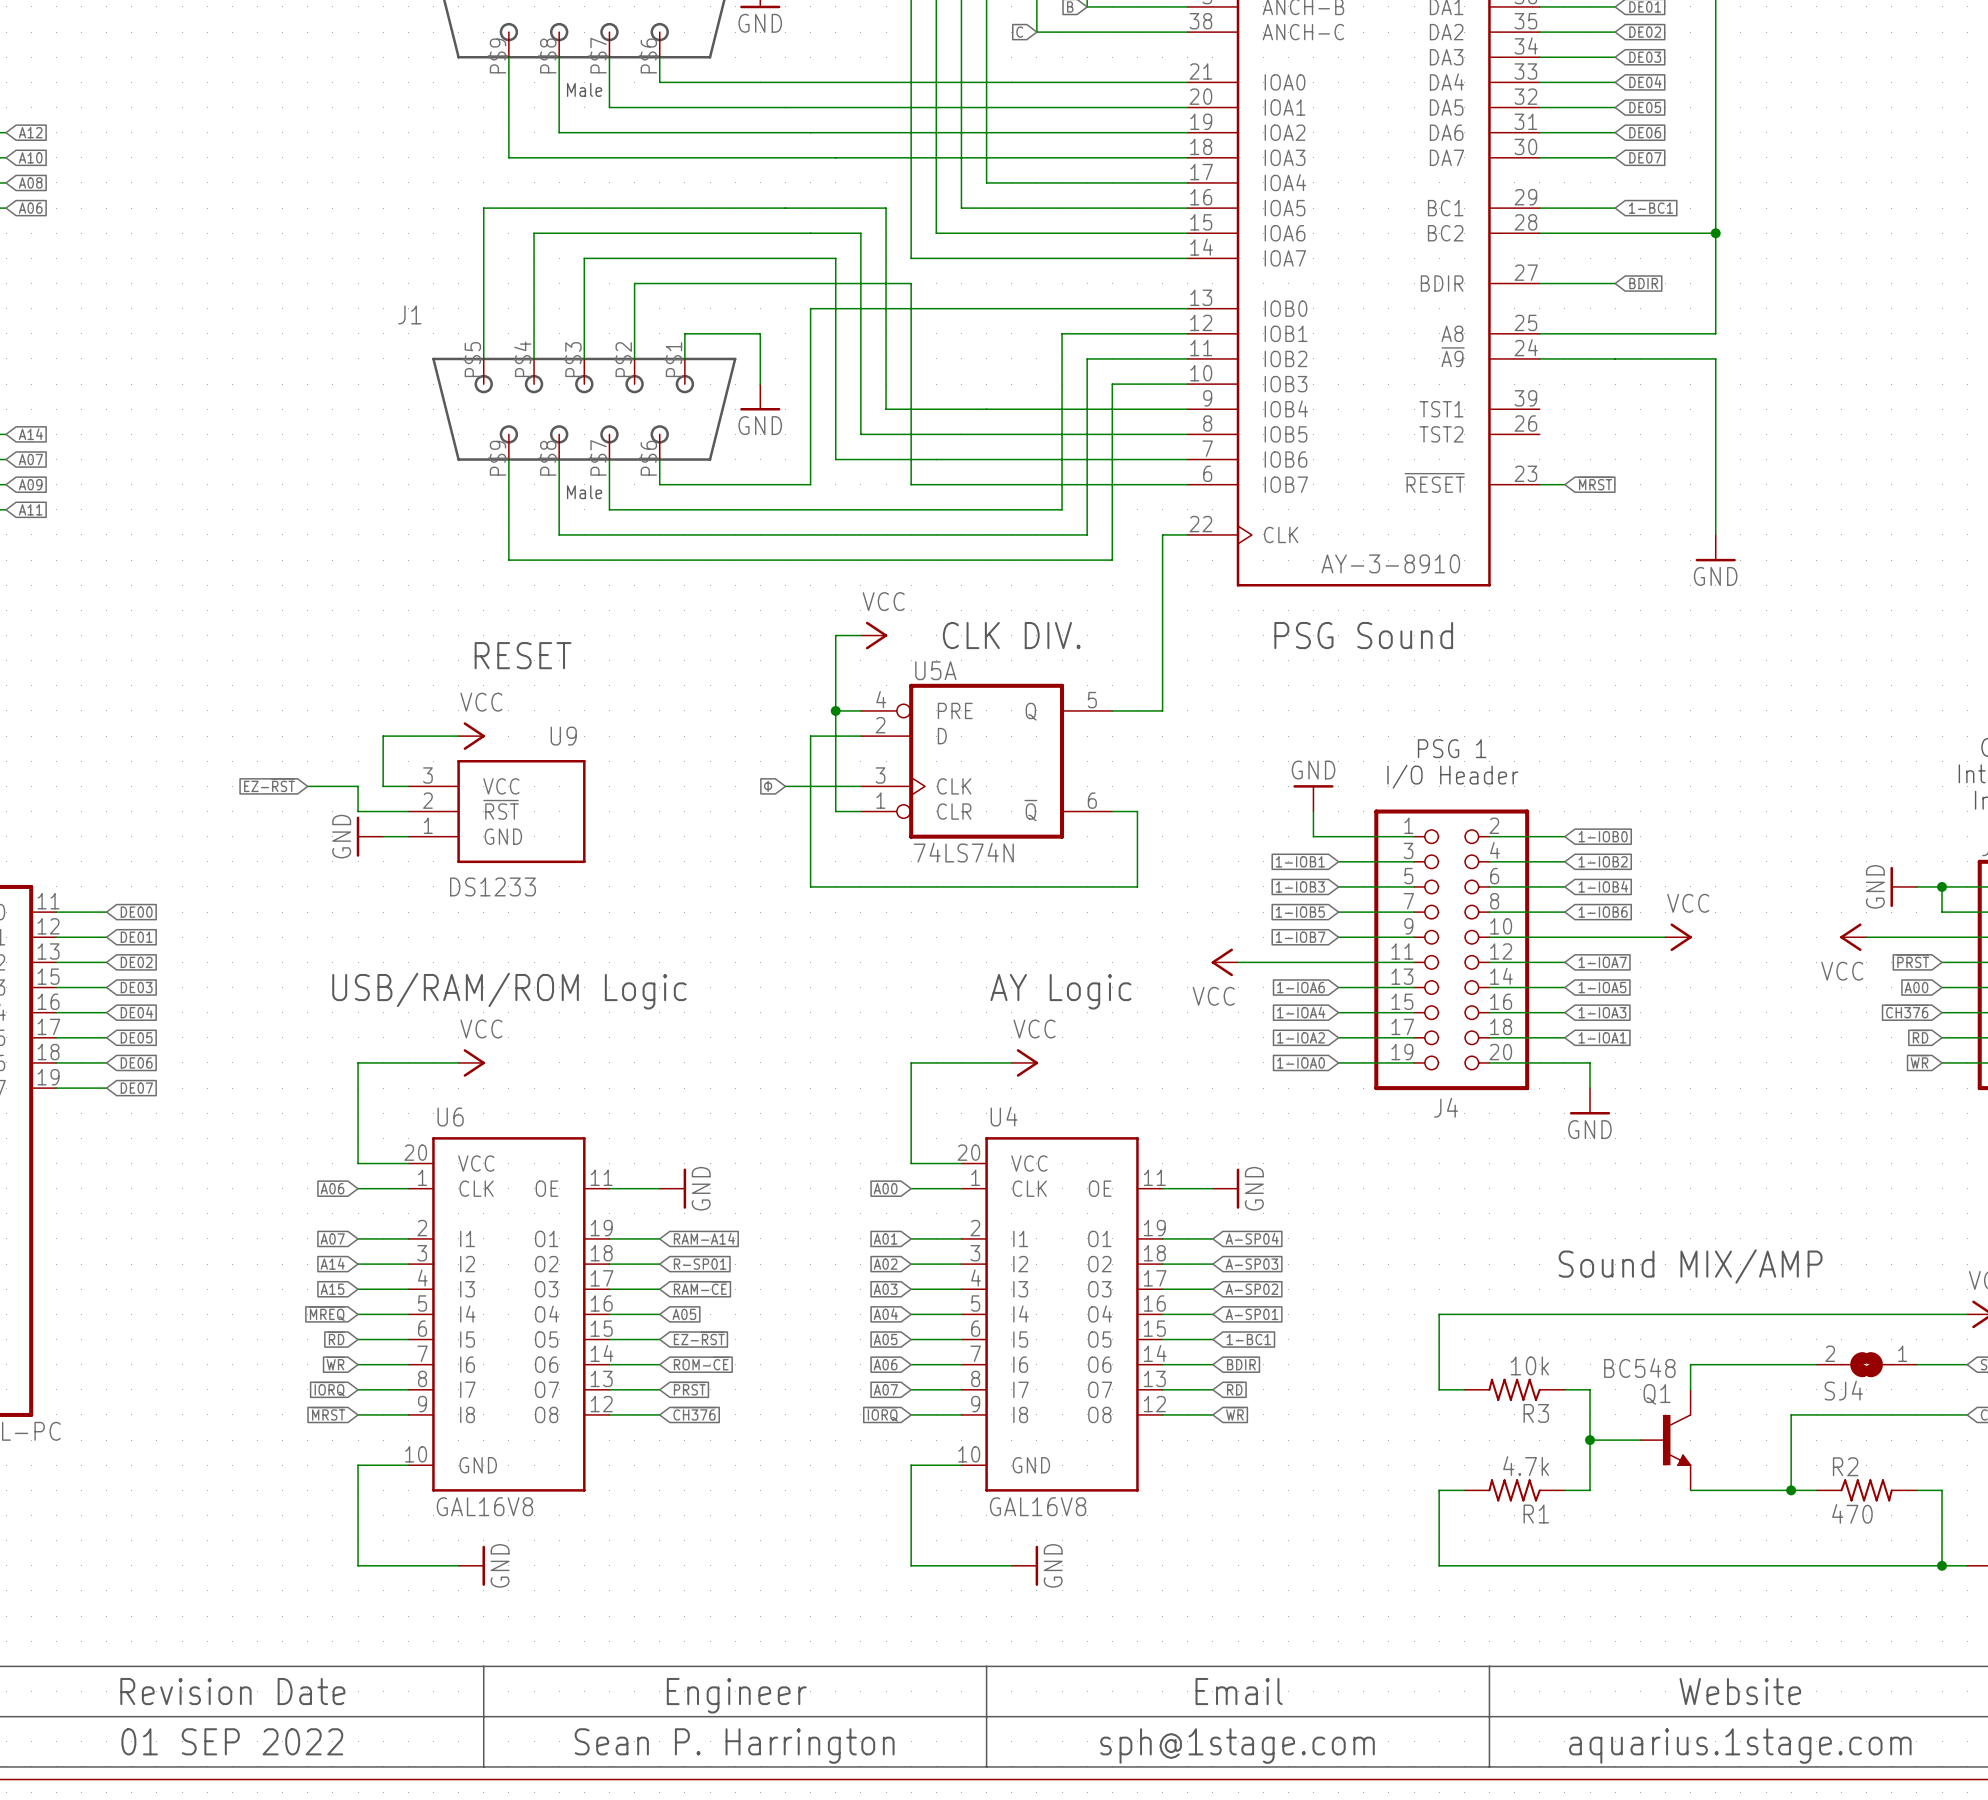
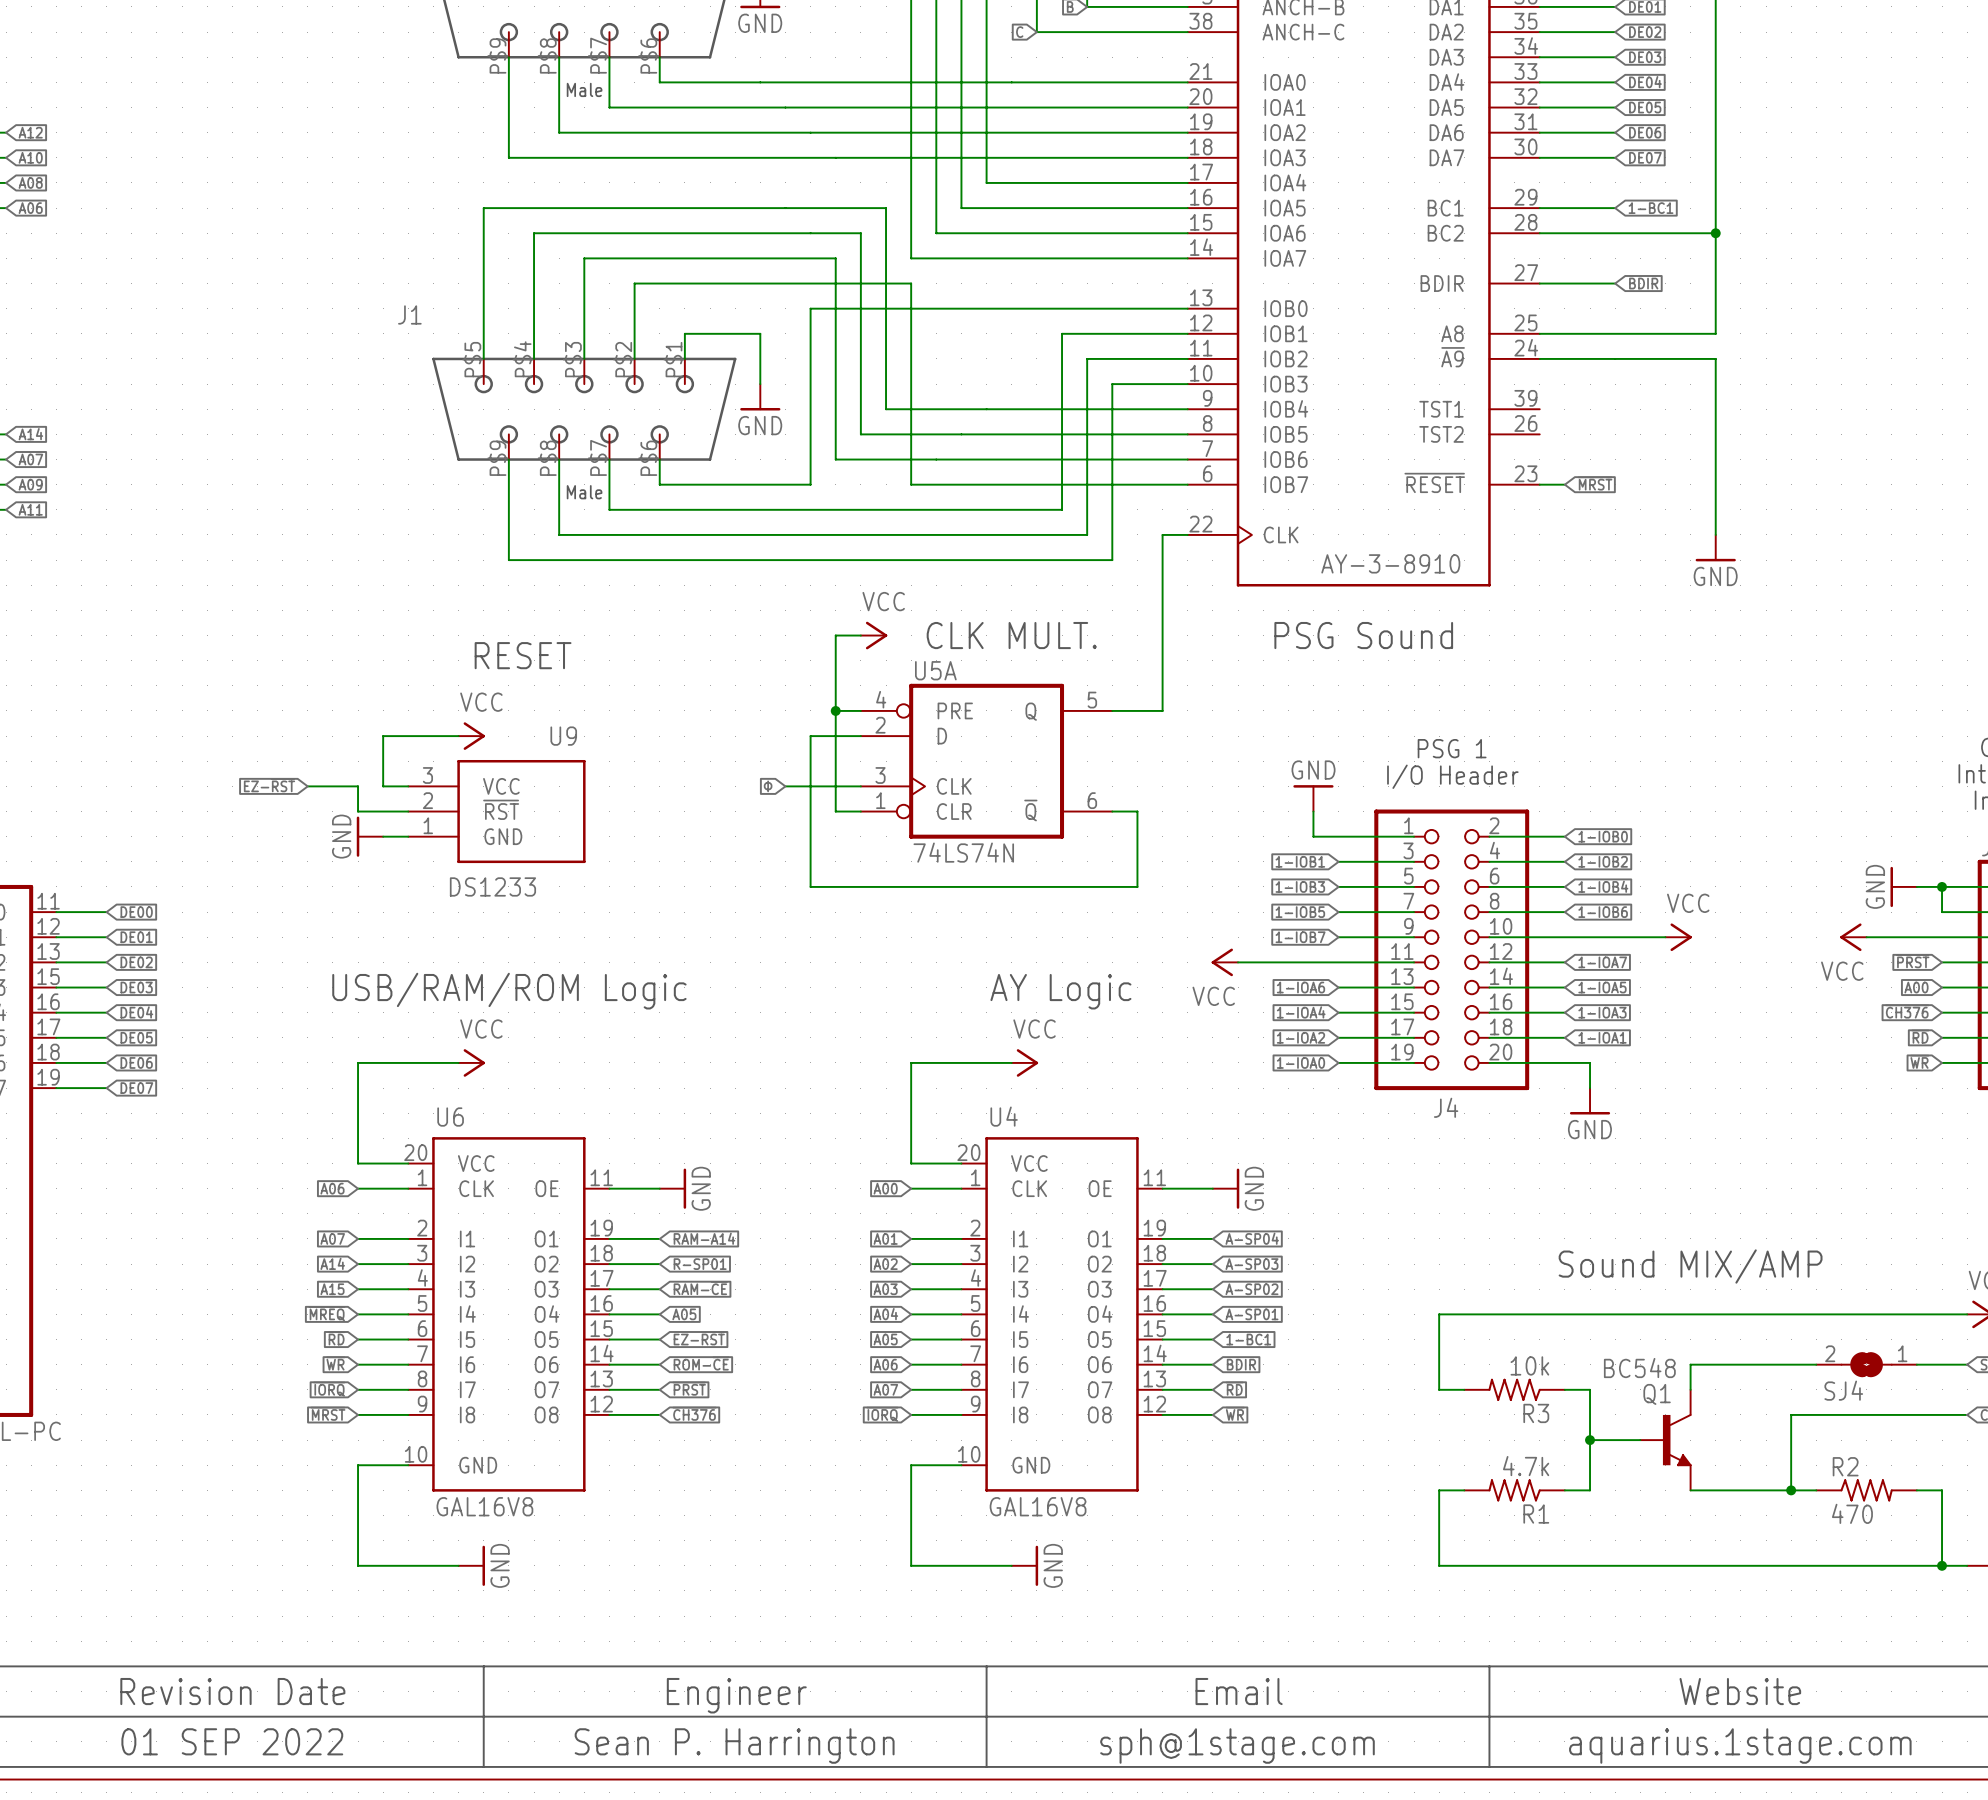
text: CLK DIV. (1011, 635) -> CLK MULT. (1011, 635)

